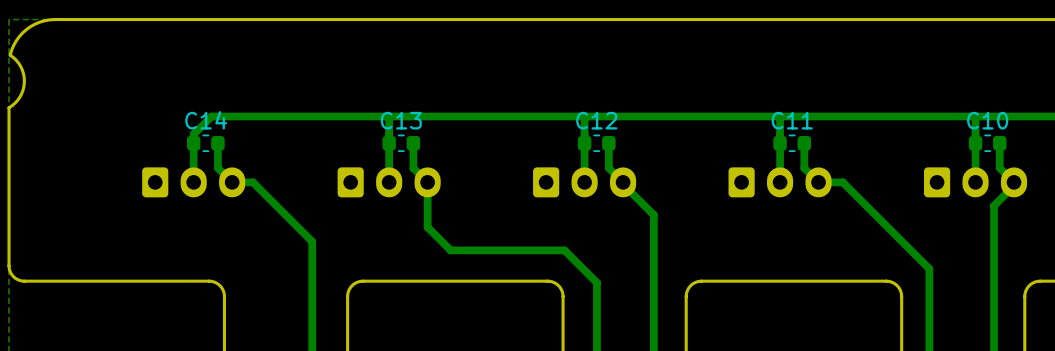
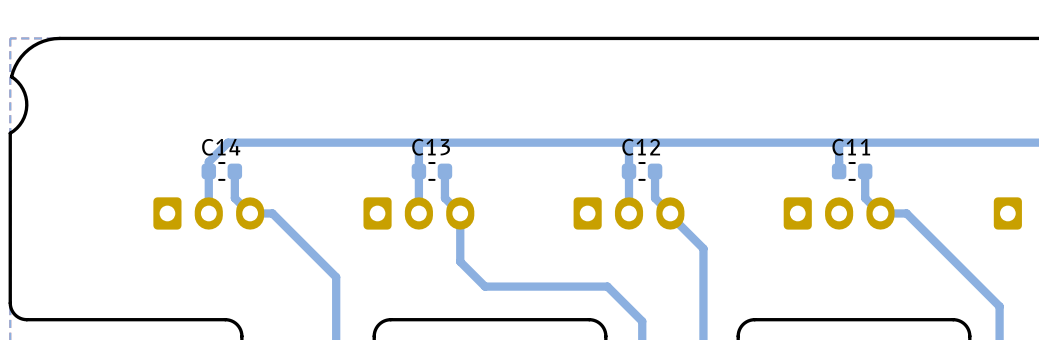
bottom track: (780, 143) (780, 182) -> none

